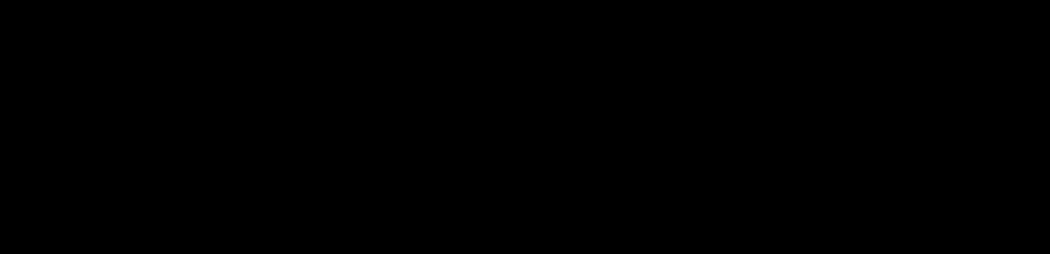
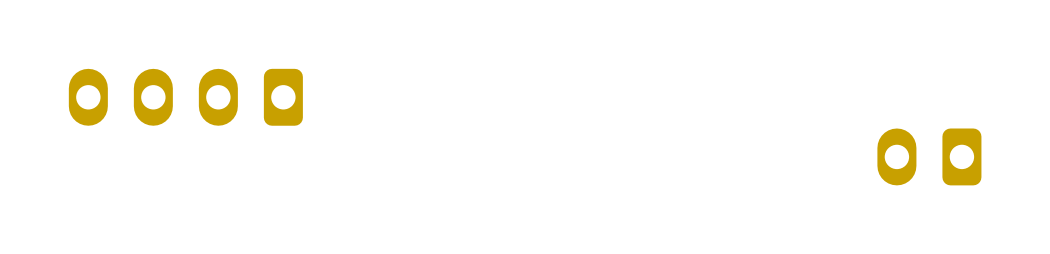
part: none -> (185, 97)
part: none -> (929, 156)

